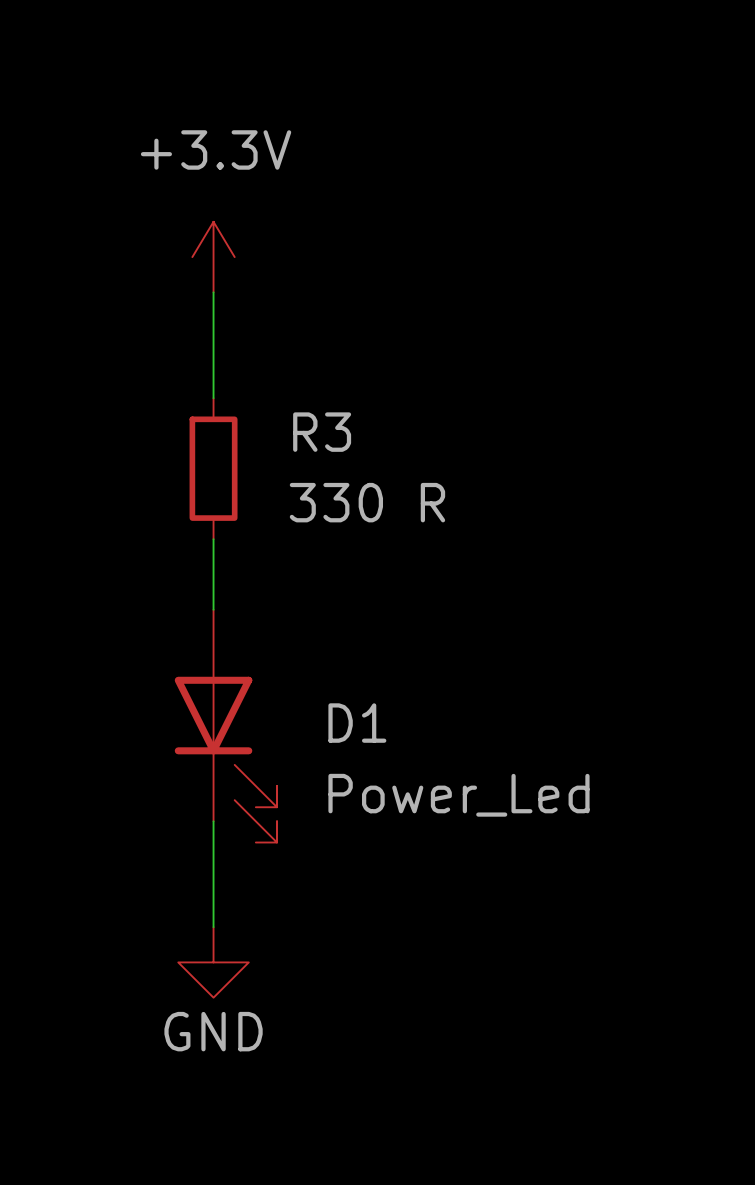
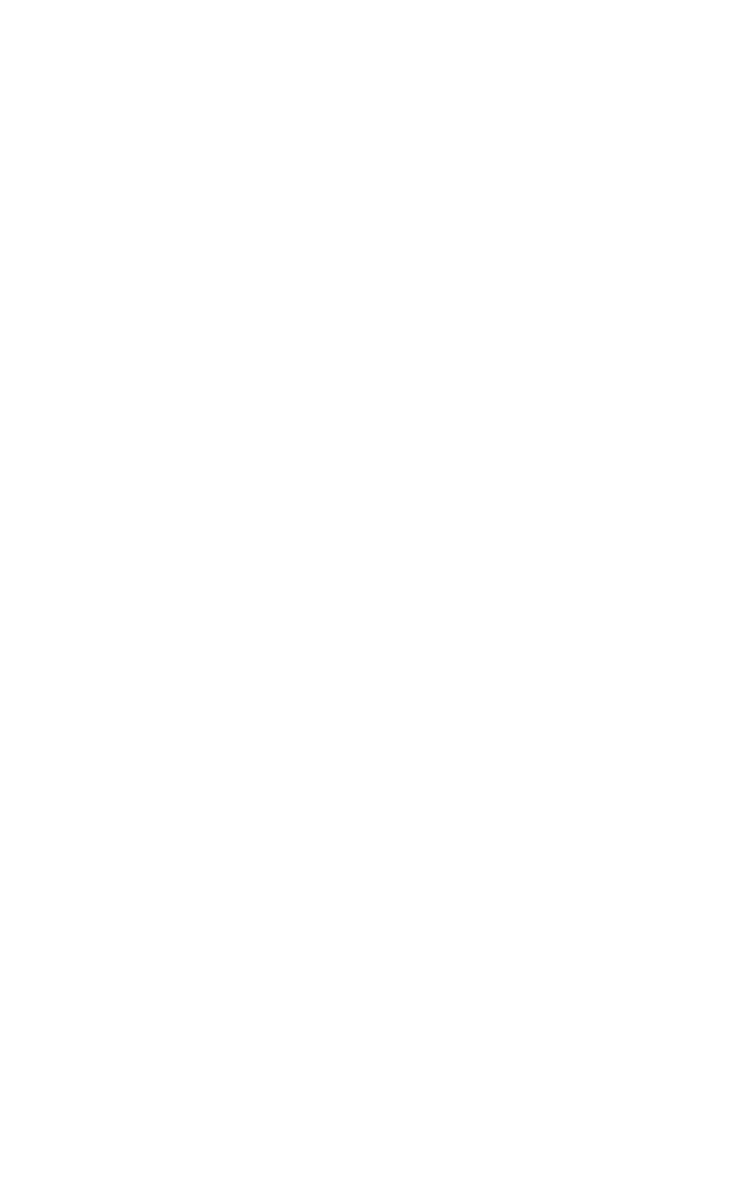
power symbol: +3.3V (213, 257) -> none
wire: (213, 292) (213, 398) -> none
R3: 330 R (213, 468) -> none
wire: (213, 539) (213, 609) -> none
D1: Power_Led (225, 726) -> none
wire: (213, 821) (213, 927) -> none
power symbol: GND (213, 962) -> none

